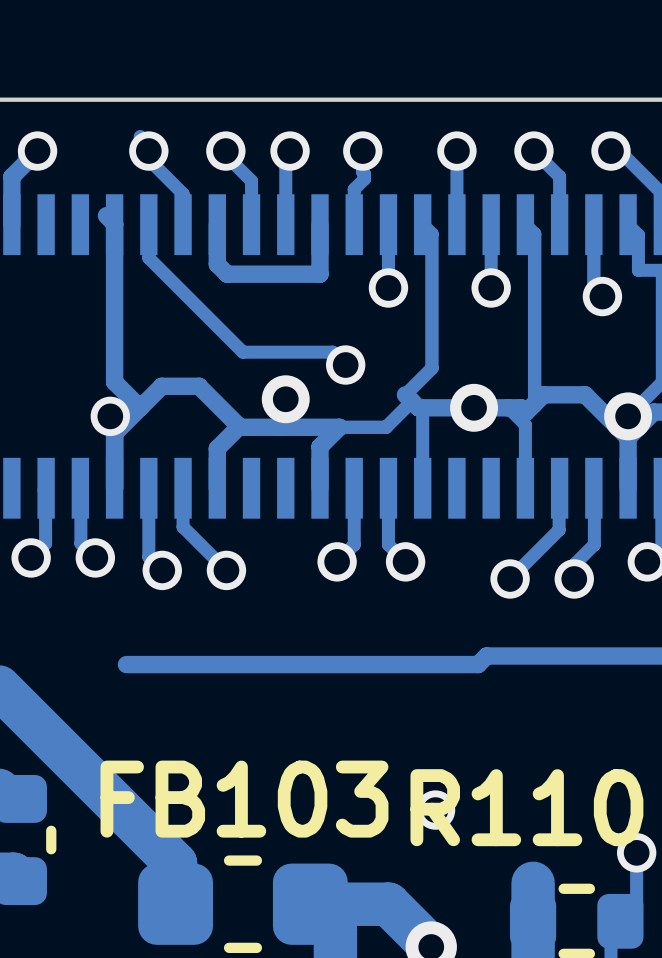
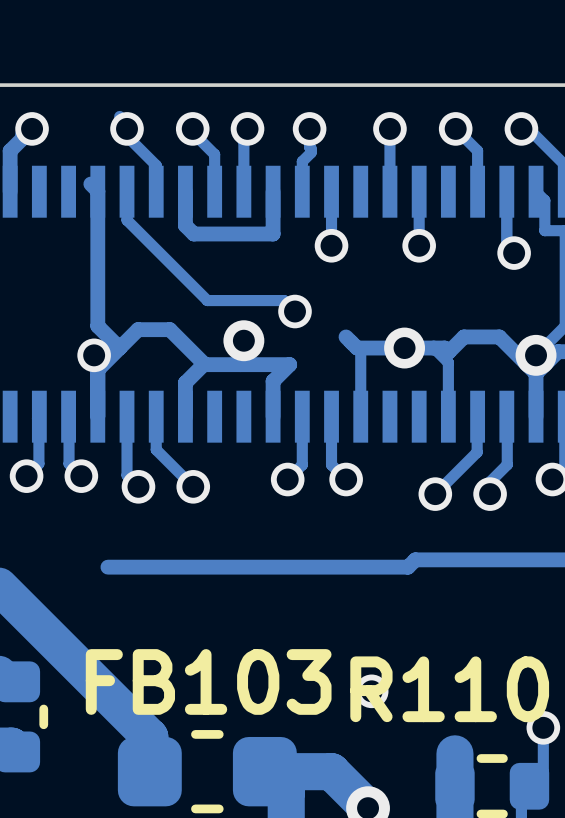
track: (422, 224) (431, 233) (431, 368) (405, 394) -> none
track: (525, 224) (534, 233) (533, 405) -> none
track: (412, 401) (386, 427) (339, 427) -> none

